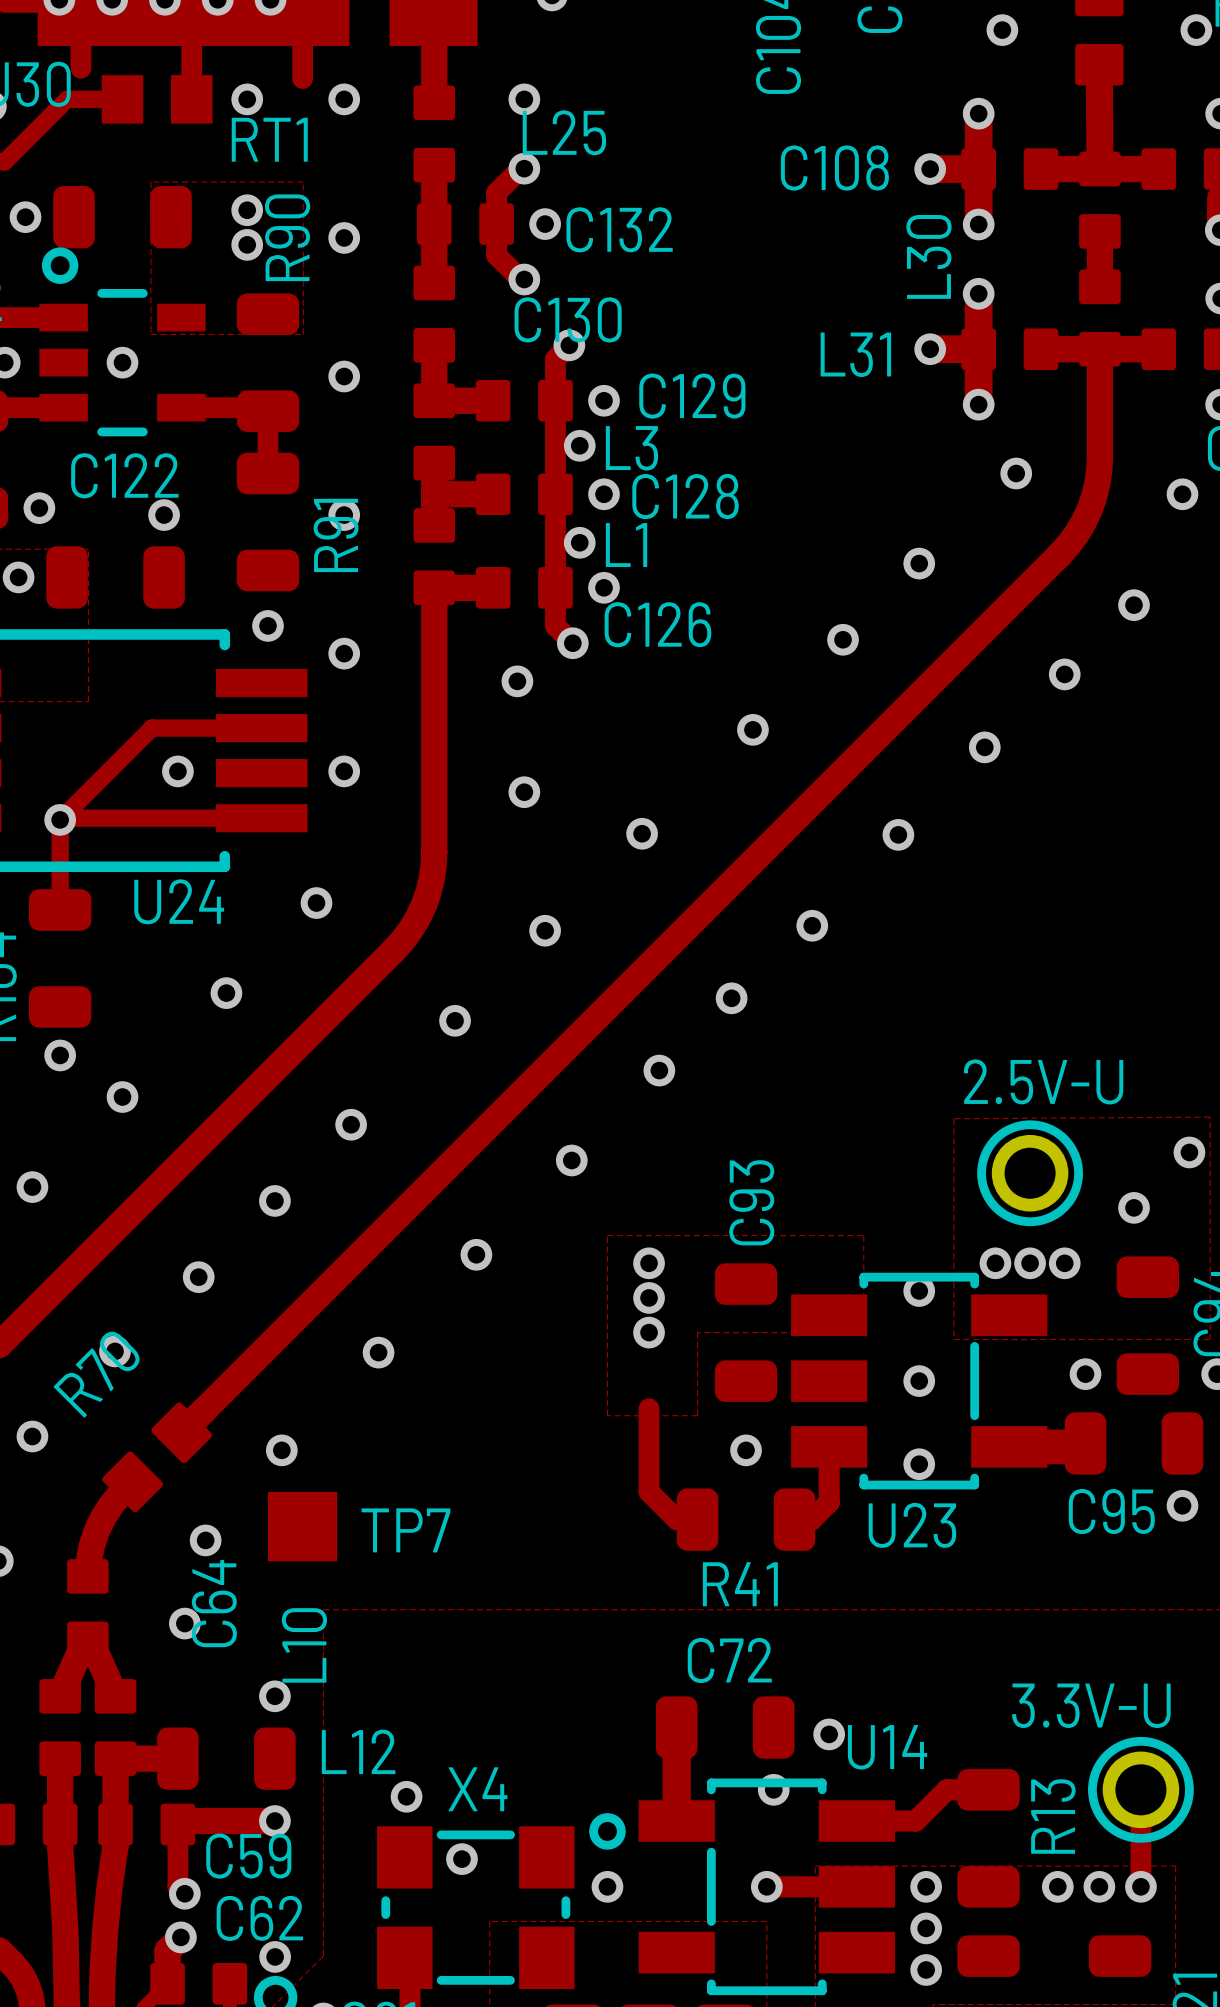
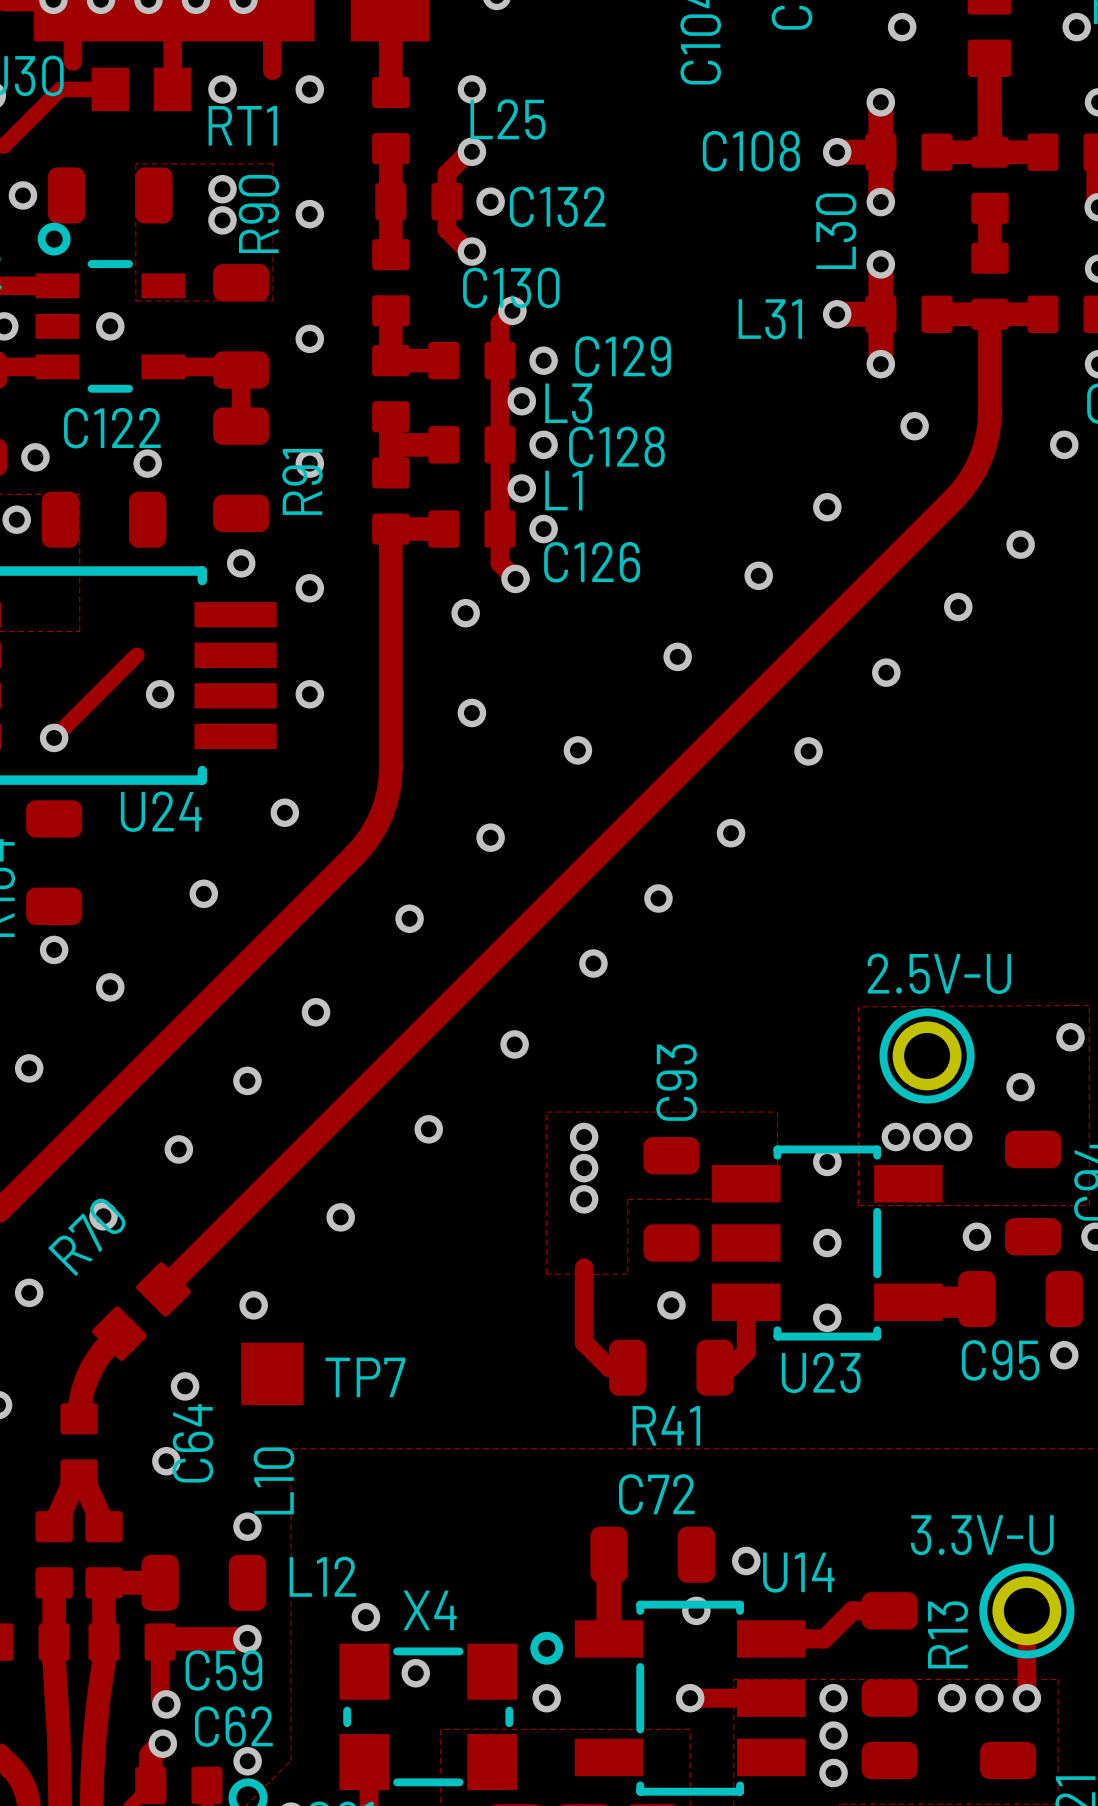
track: (151, 728) (261, 728) -> none
track: (61, 818) (261, 818) -> none
track: (60, 819) (60, 909) -> none

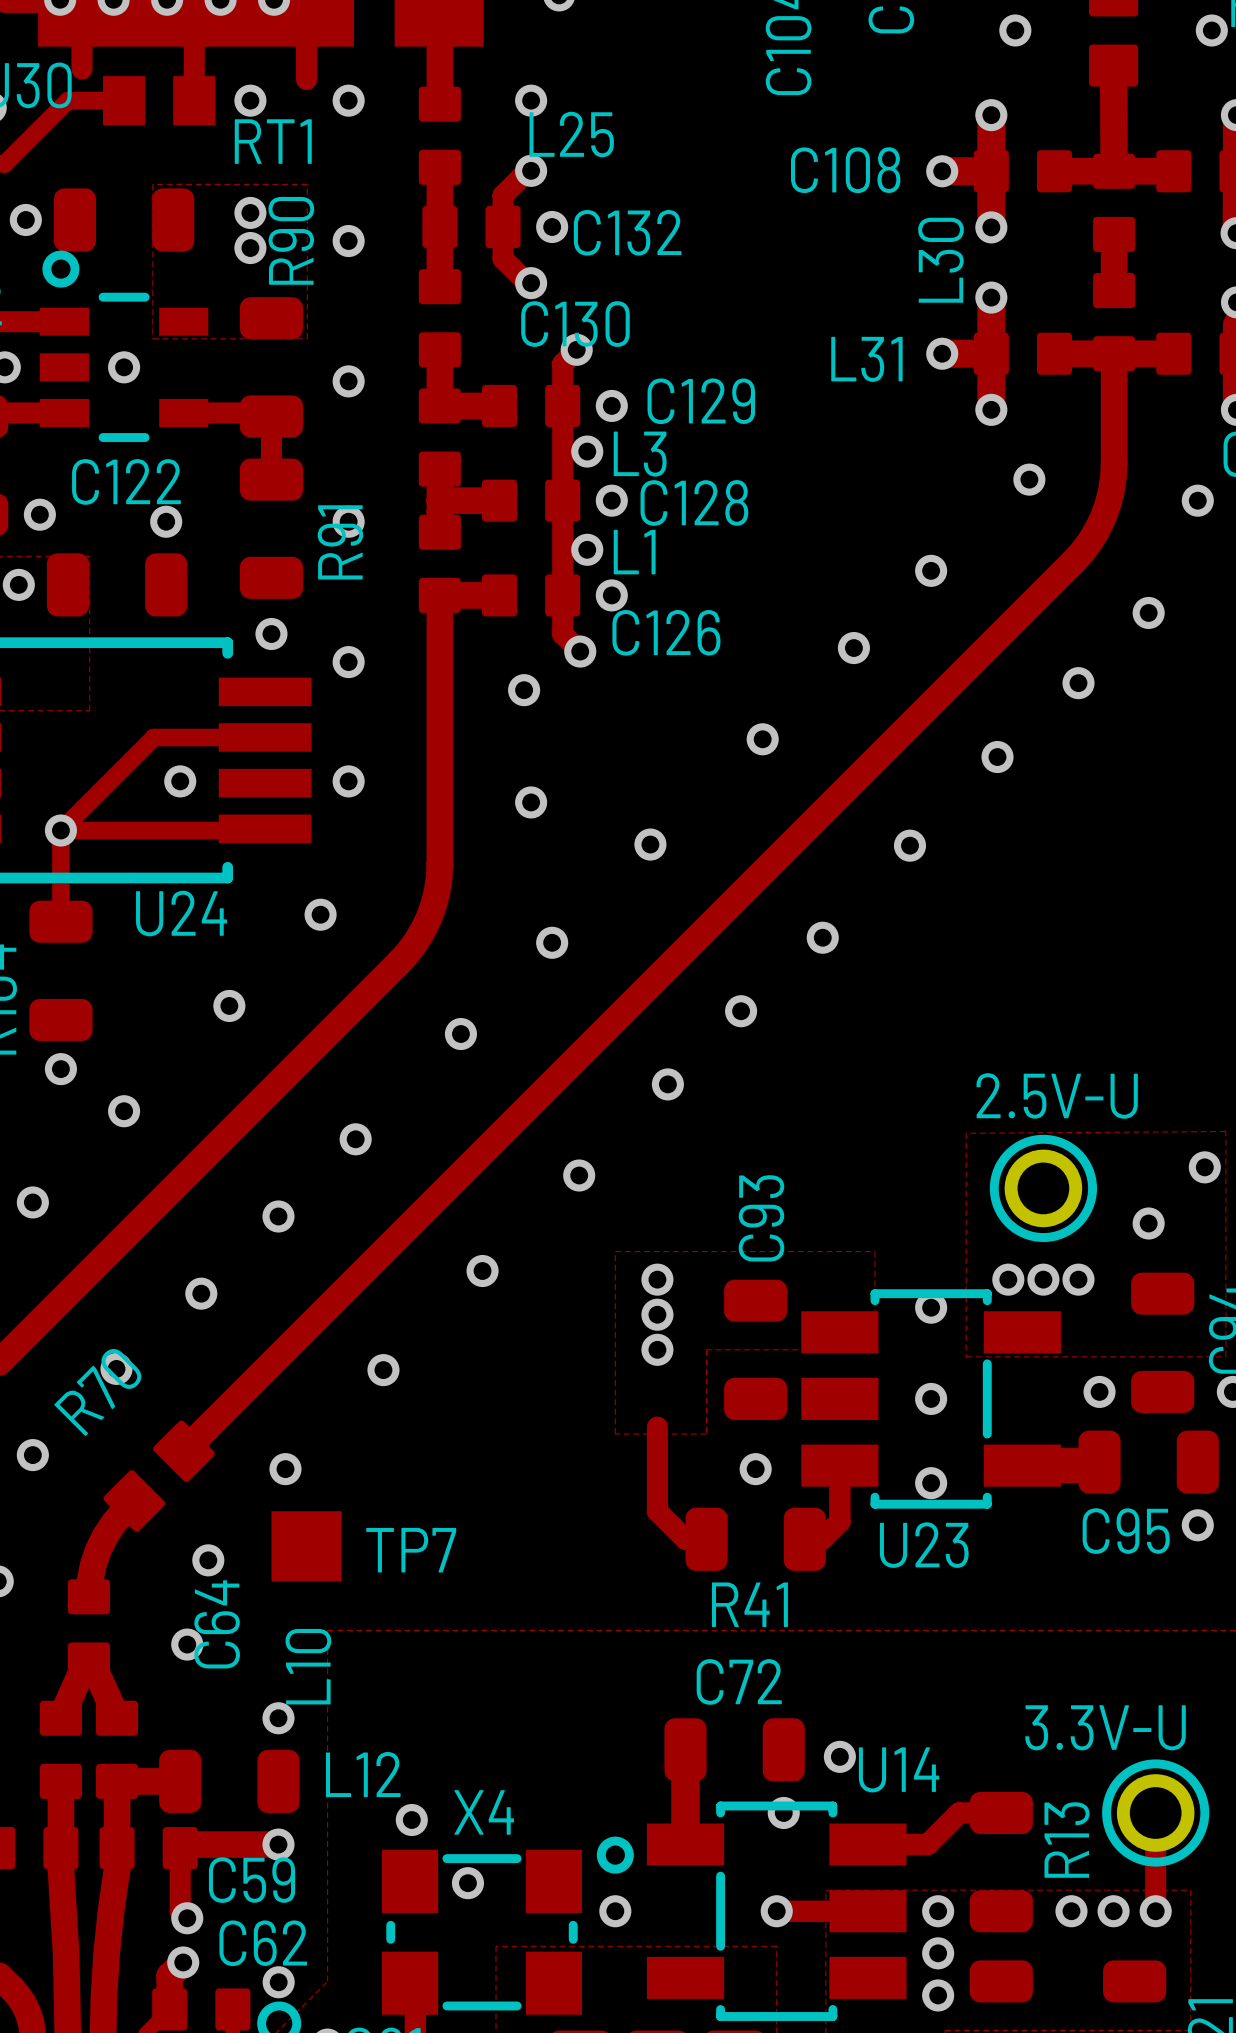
track: none -> (153, 737) (265, 737)
track: none -> (265, 828) (263, 830) (60, 830) (60, 921)

